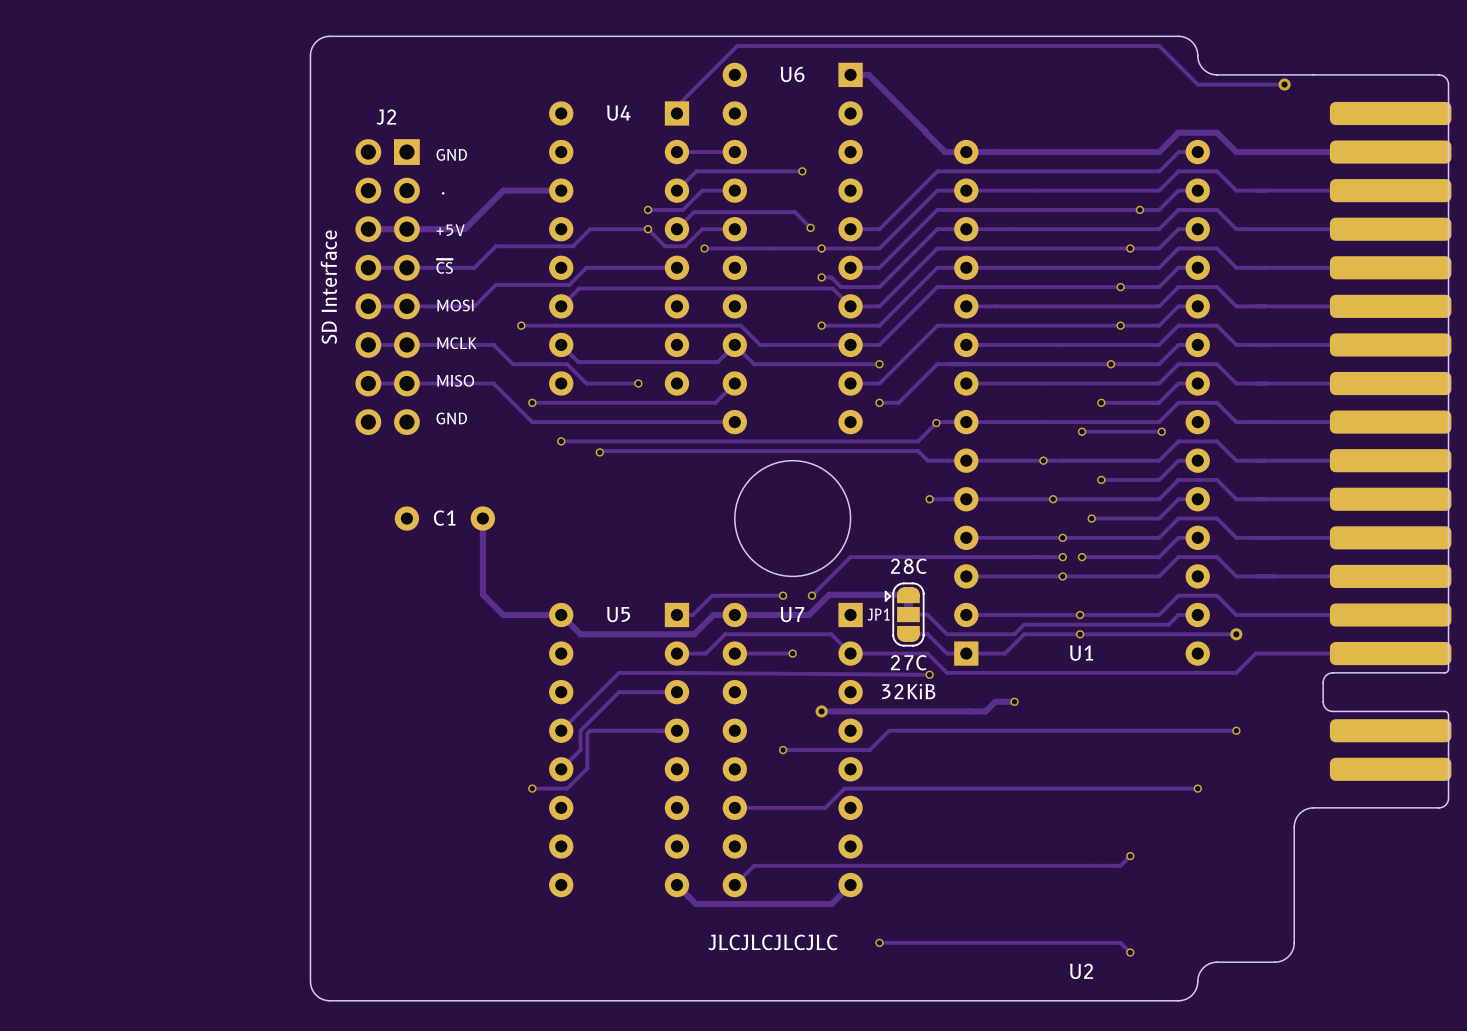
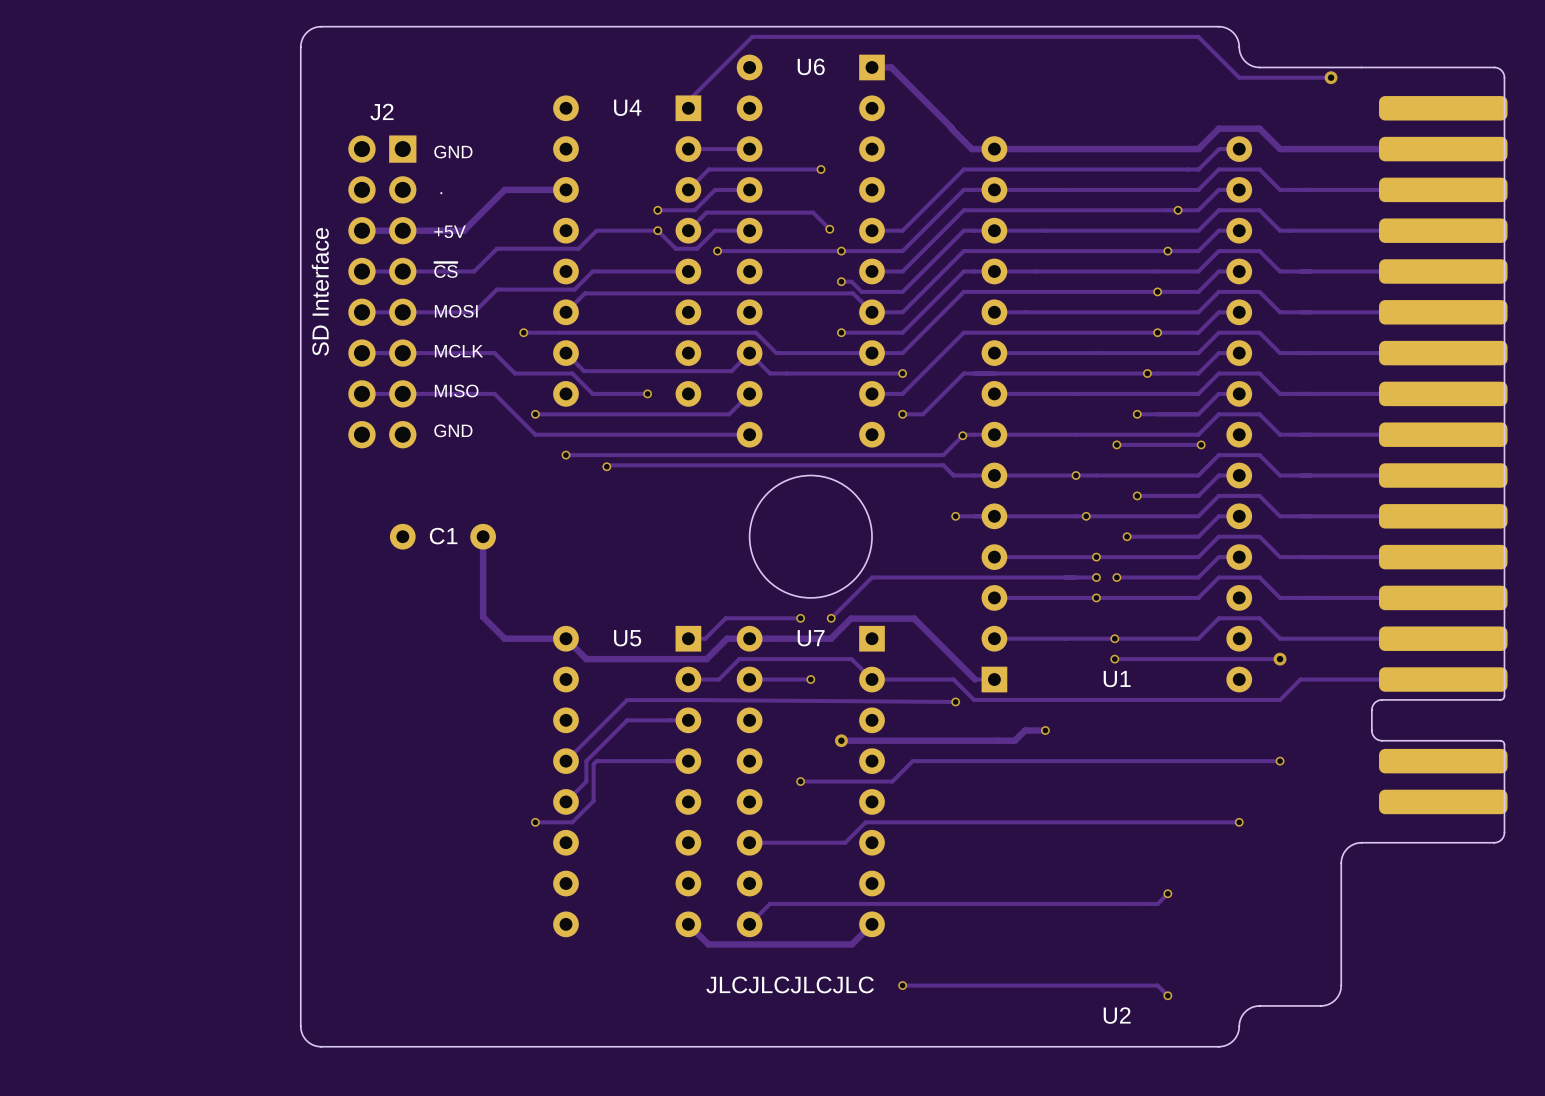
text: 28C (908, 566) -> none
track: (908, 594) (829, 594) (809, 614) -> (975, 679) (914, 618) (851, 618) (831, 638) (828, 638)
JP1: 32KiB (904, 614) -> none
track: (908, 614) (927, 614) (947, 634) (1014, 634) (1024, 624) (1168, 624) (1178, 614) (1197, 614) -> none
track: (908, 634) (927, 634) (948, 653) -> none
track: (1080, 634) (1024, 634) (1004, 653) (966, 653) -> none
text: 27C (908, 662) -> none

